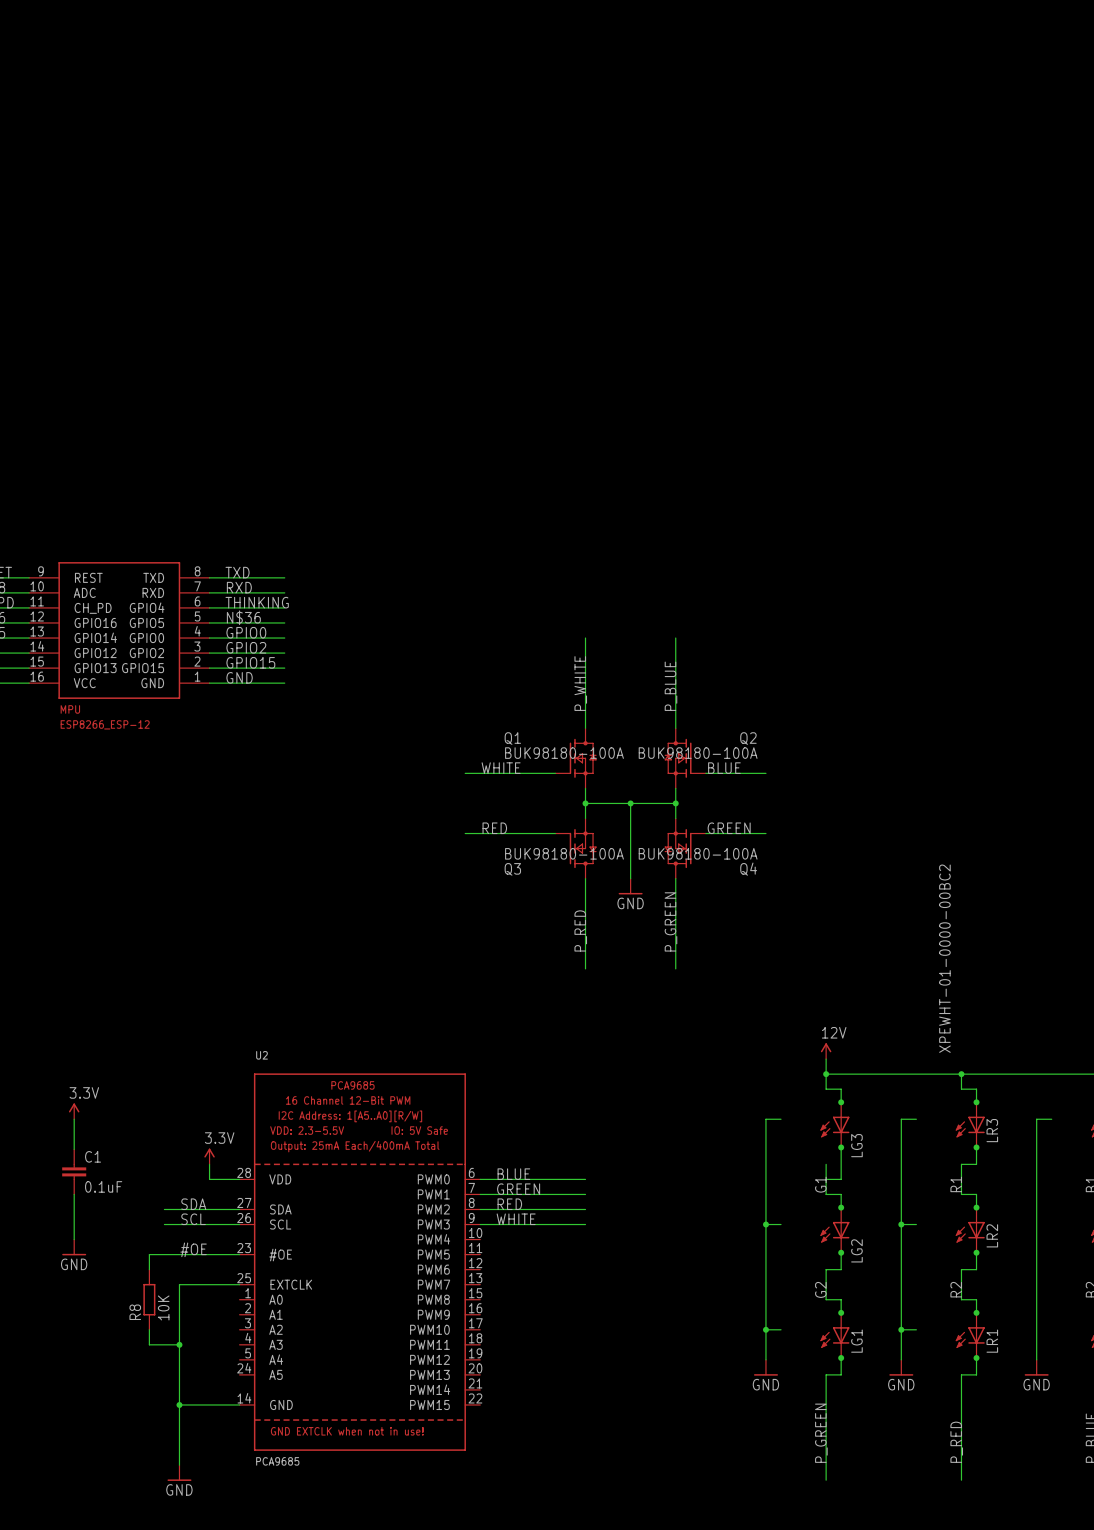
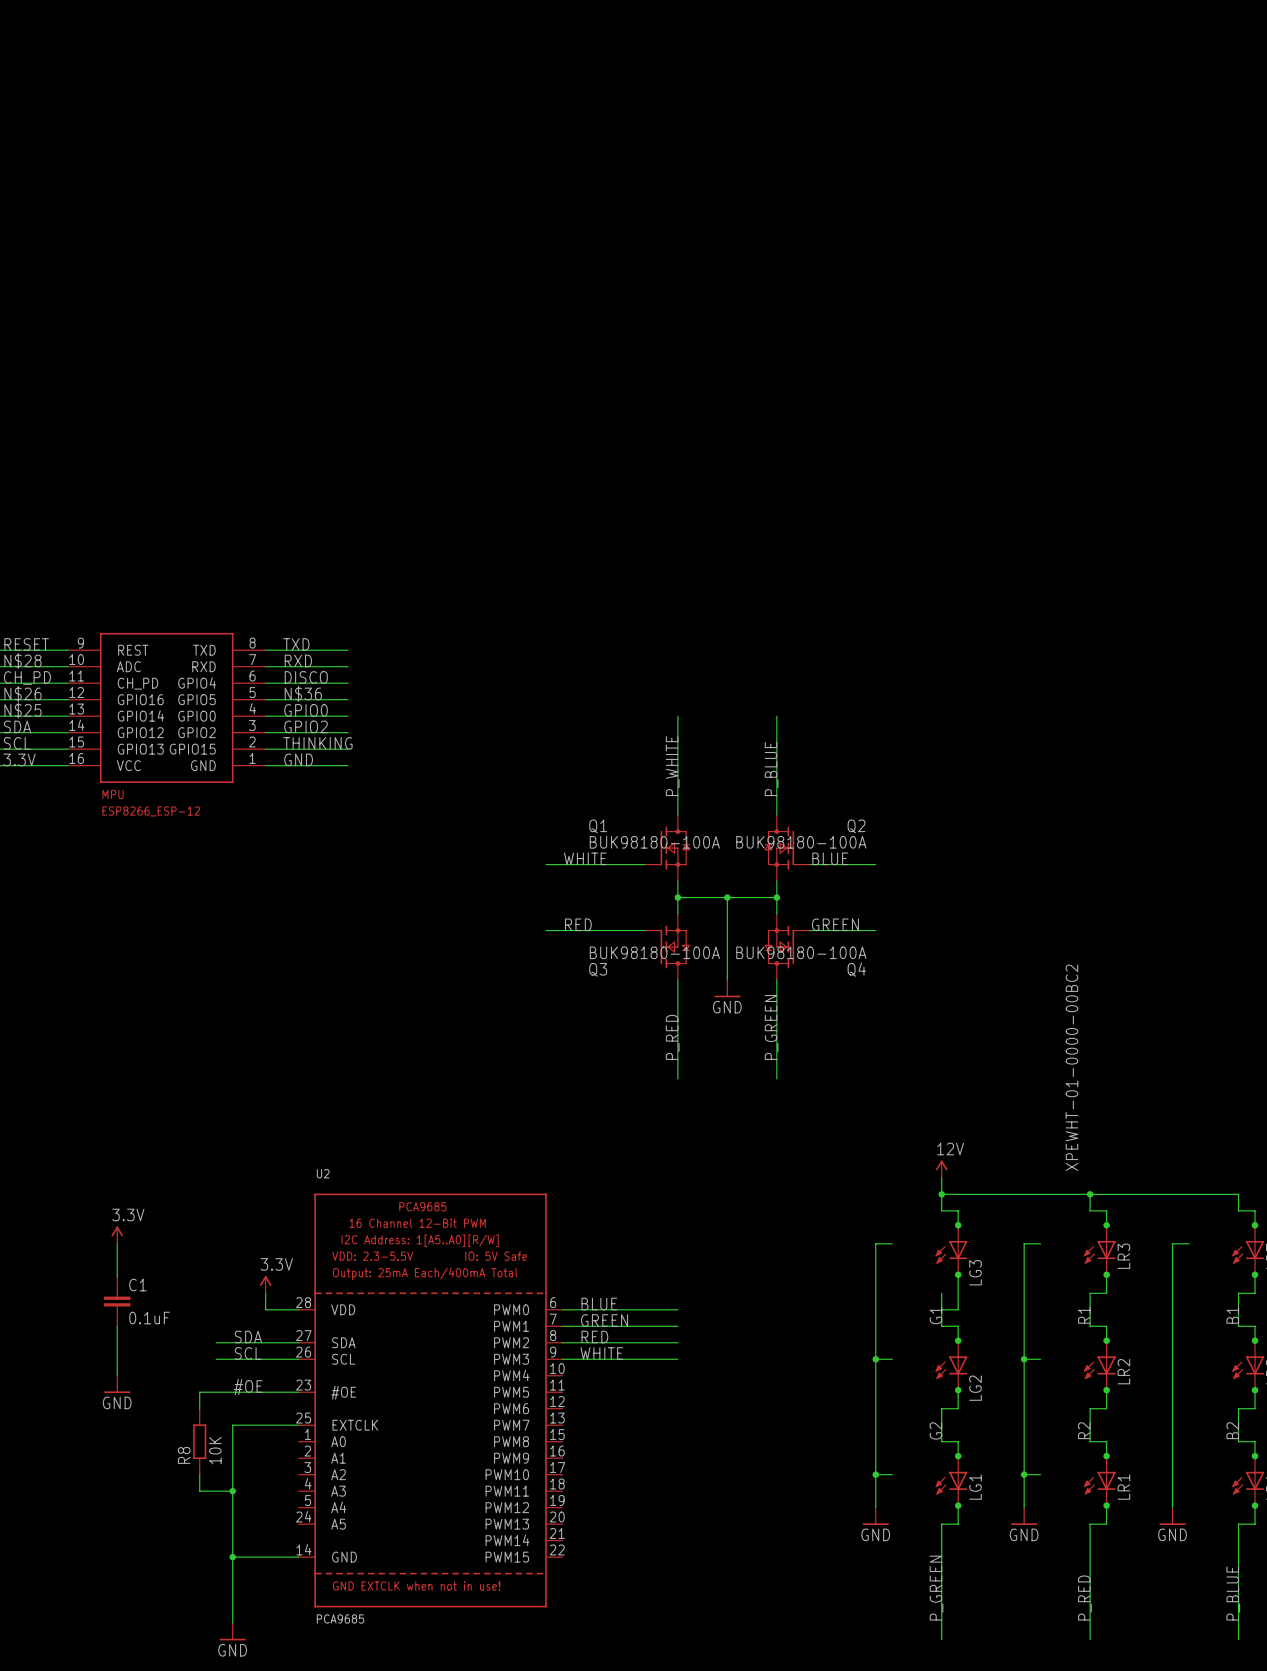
label: THINKING (257, 602) -> DISCO (306, 677)
label: GPIO15 (250, 662) -> THINKING (317, 743)

